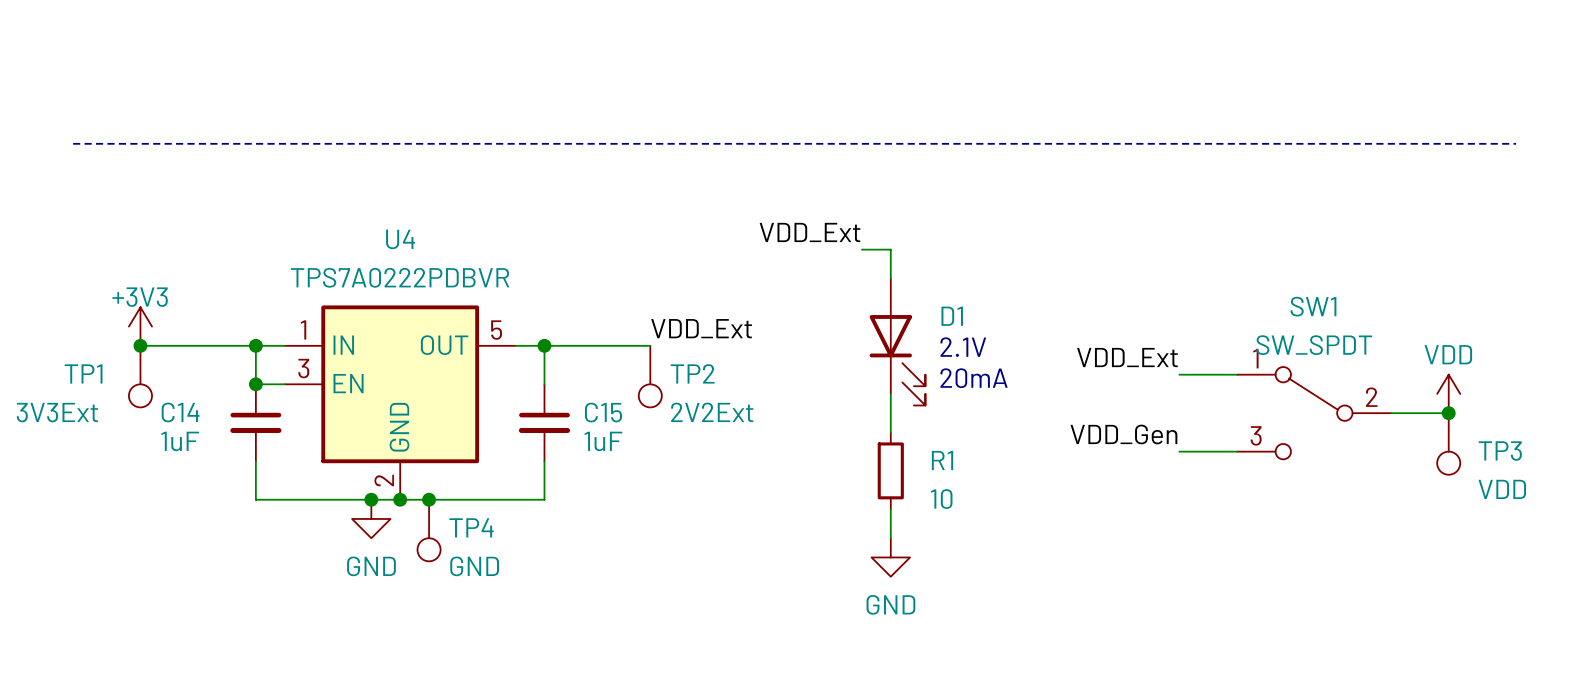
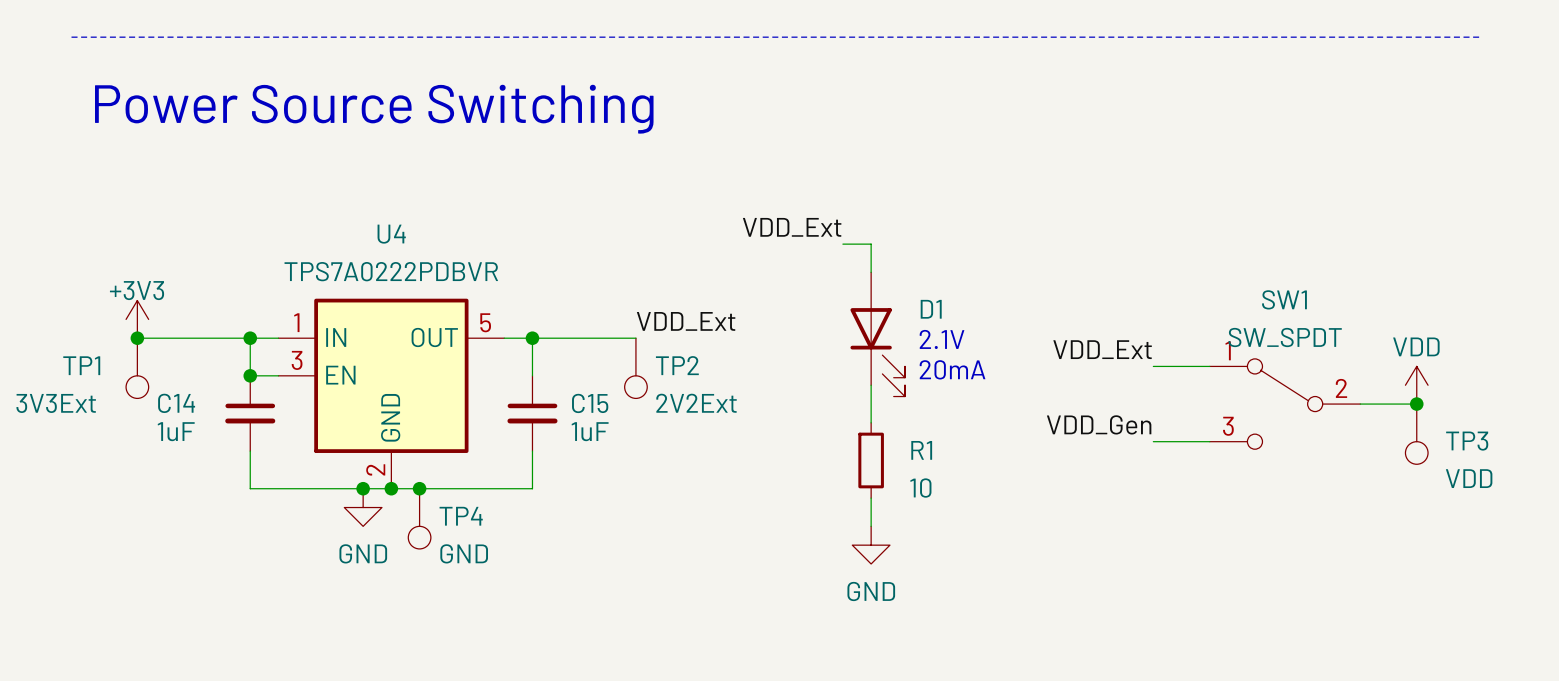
text: none -> Power Source Switching (374, 109)
line: (73, 143) (1516, 143) -> (71, 37) (1482, 37)

